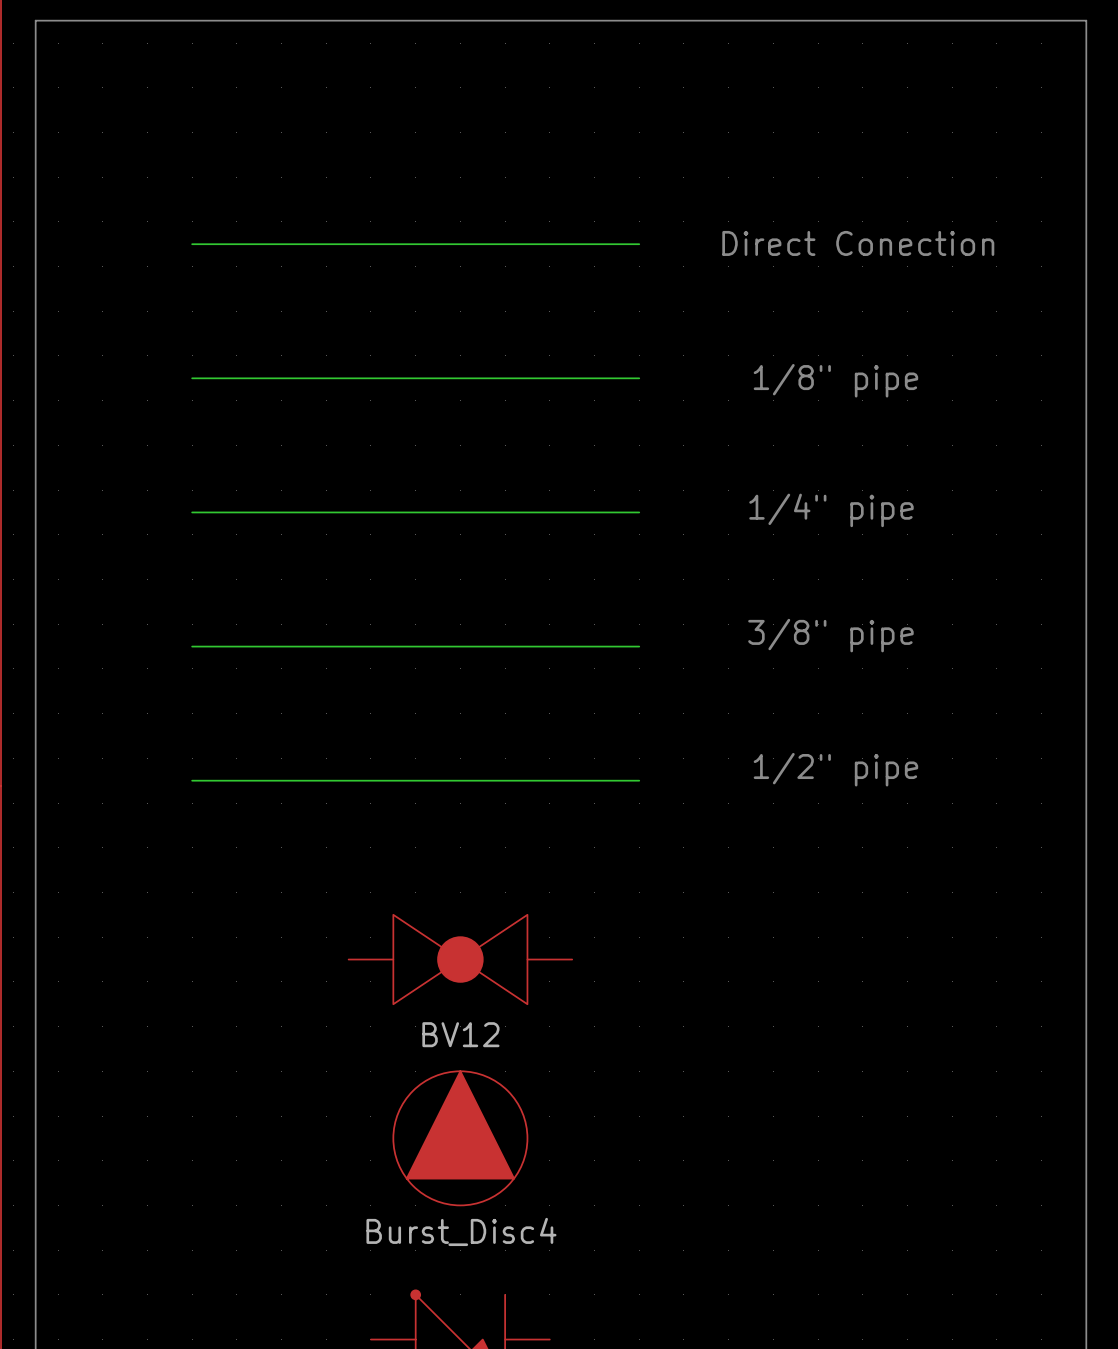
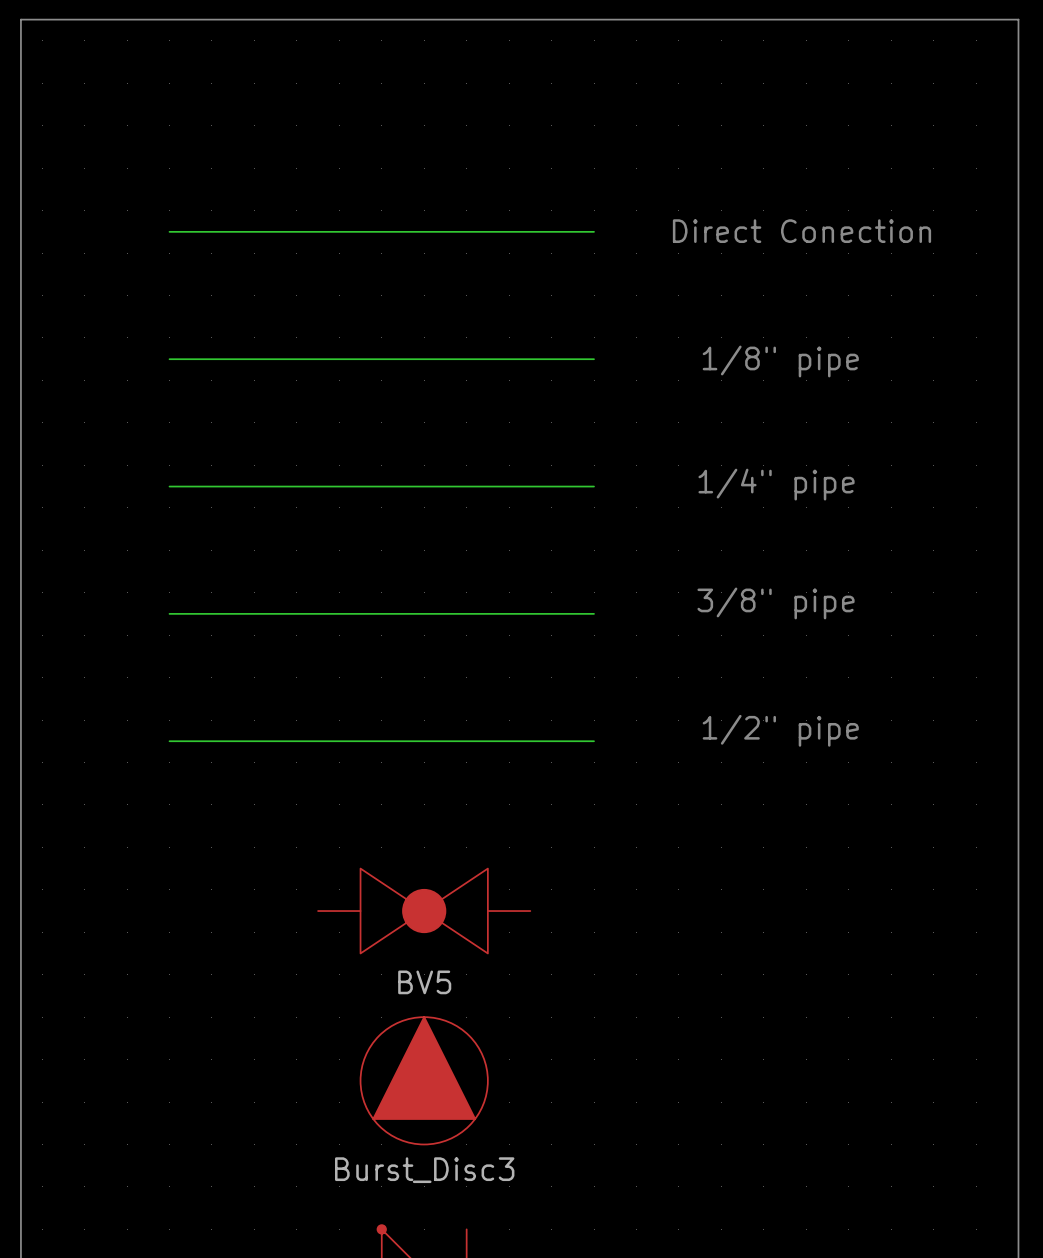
BV12 name: BV12 (460, 1034) -> BV5 (424, 982)
Burst_Disc4 name: Burst_Disc4 (461, 1231) -> Burst_Disc3 (424, 1170)

